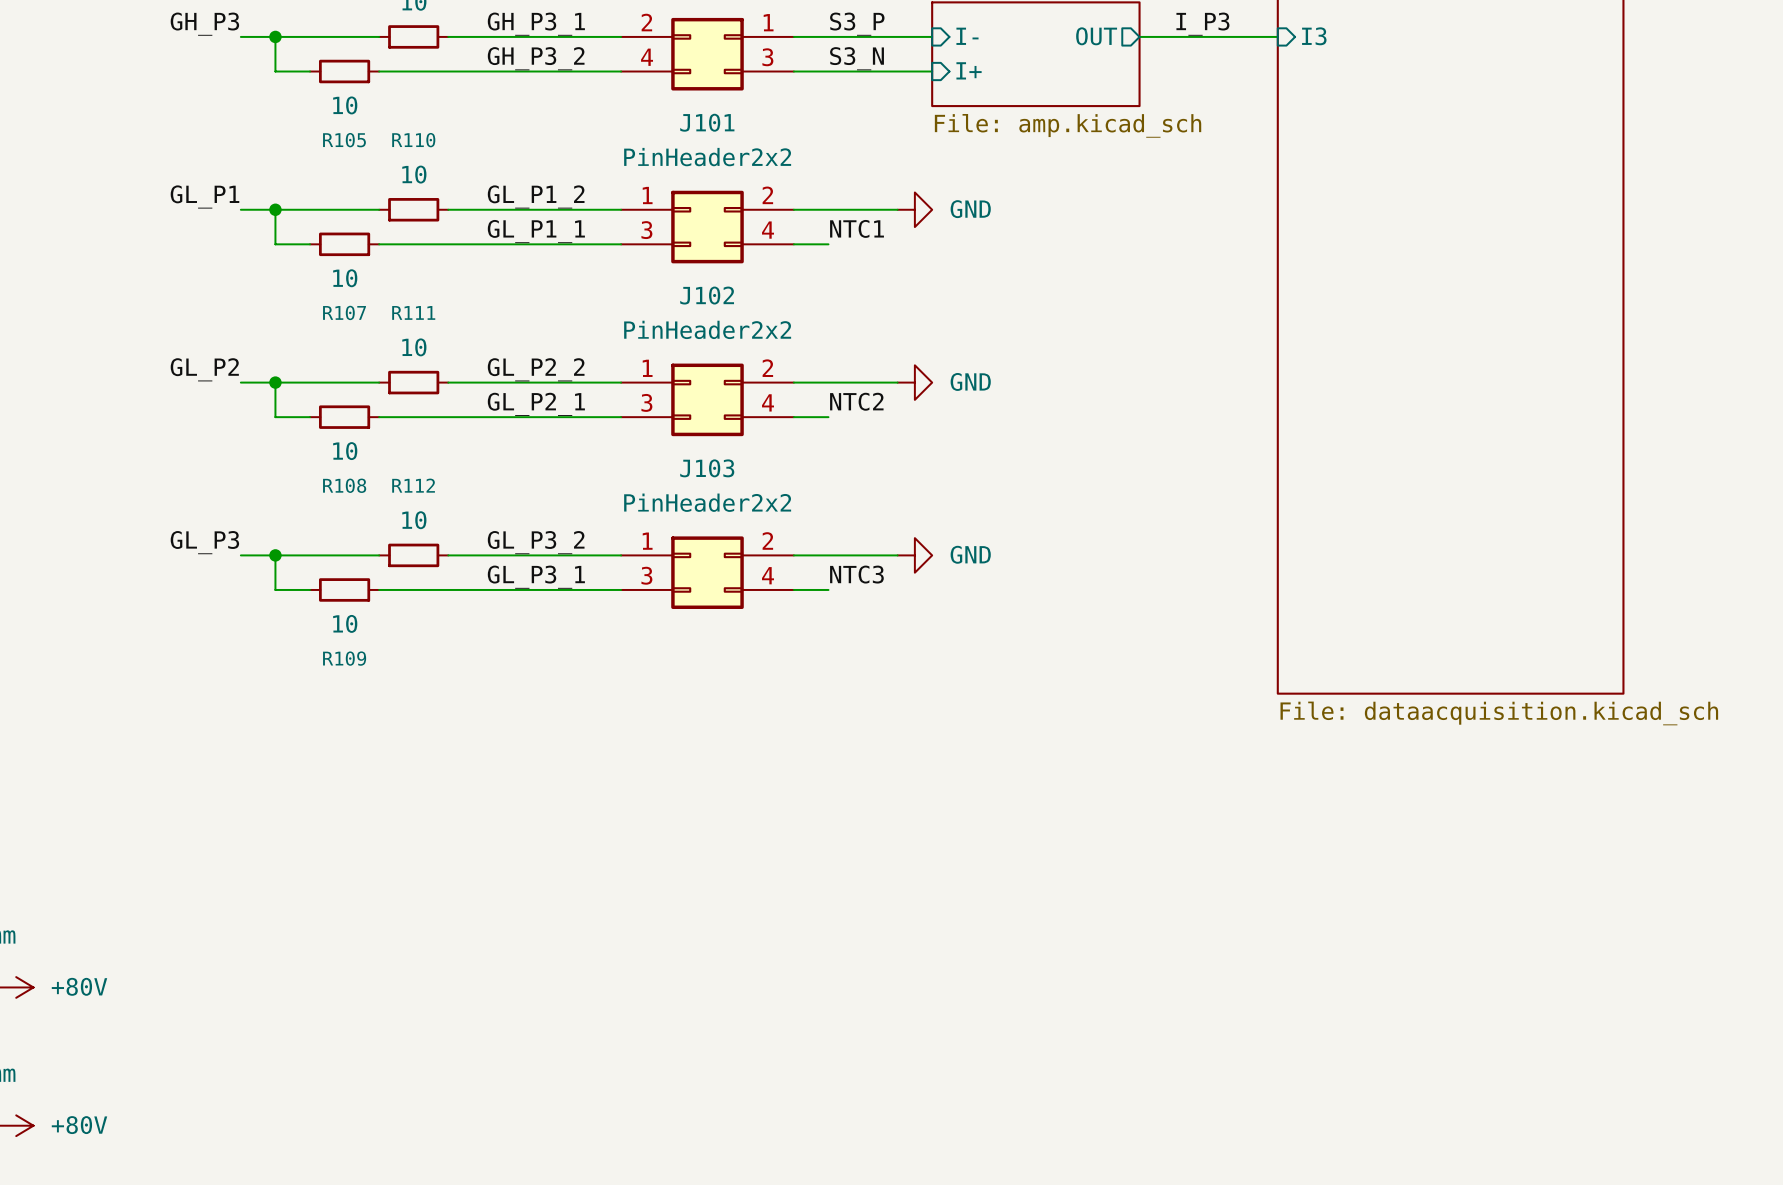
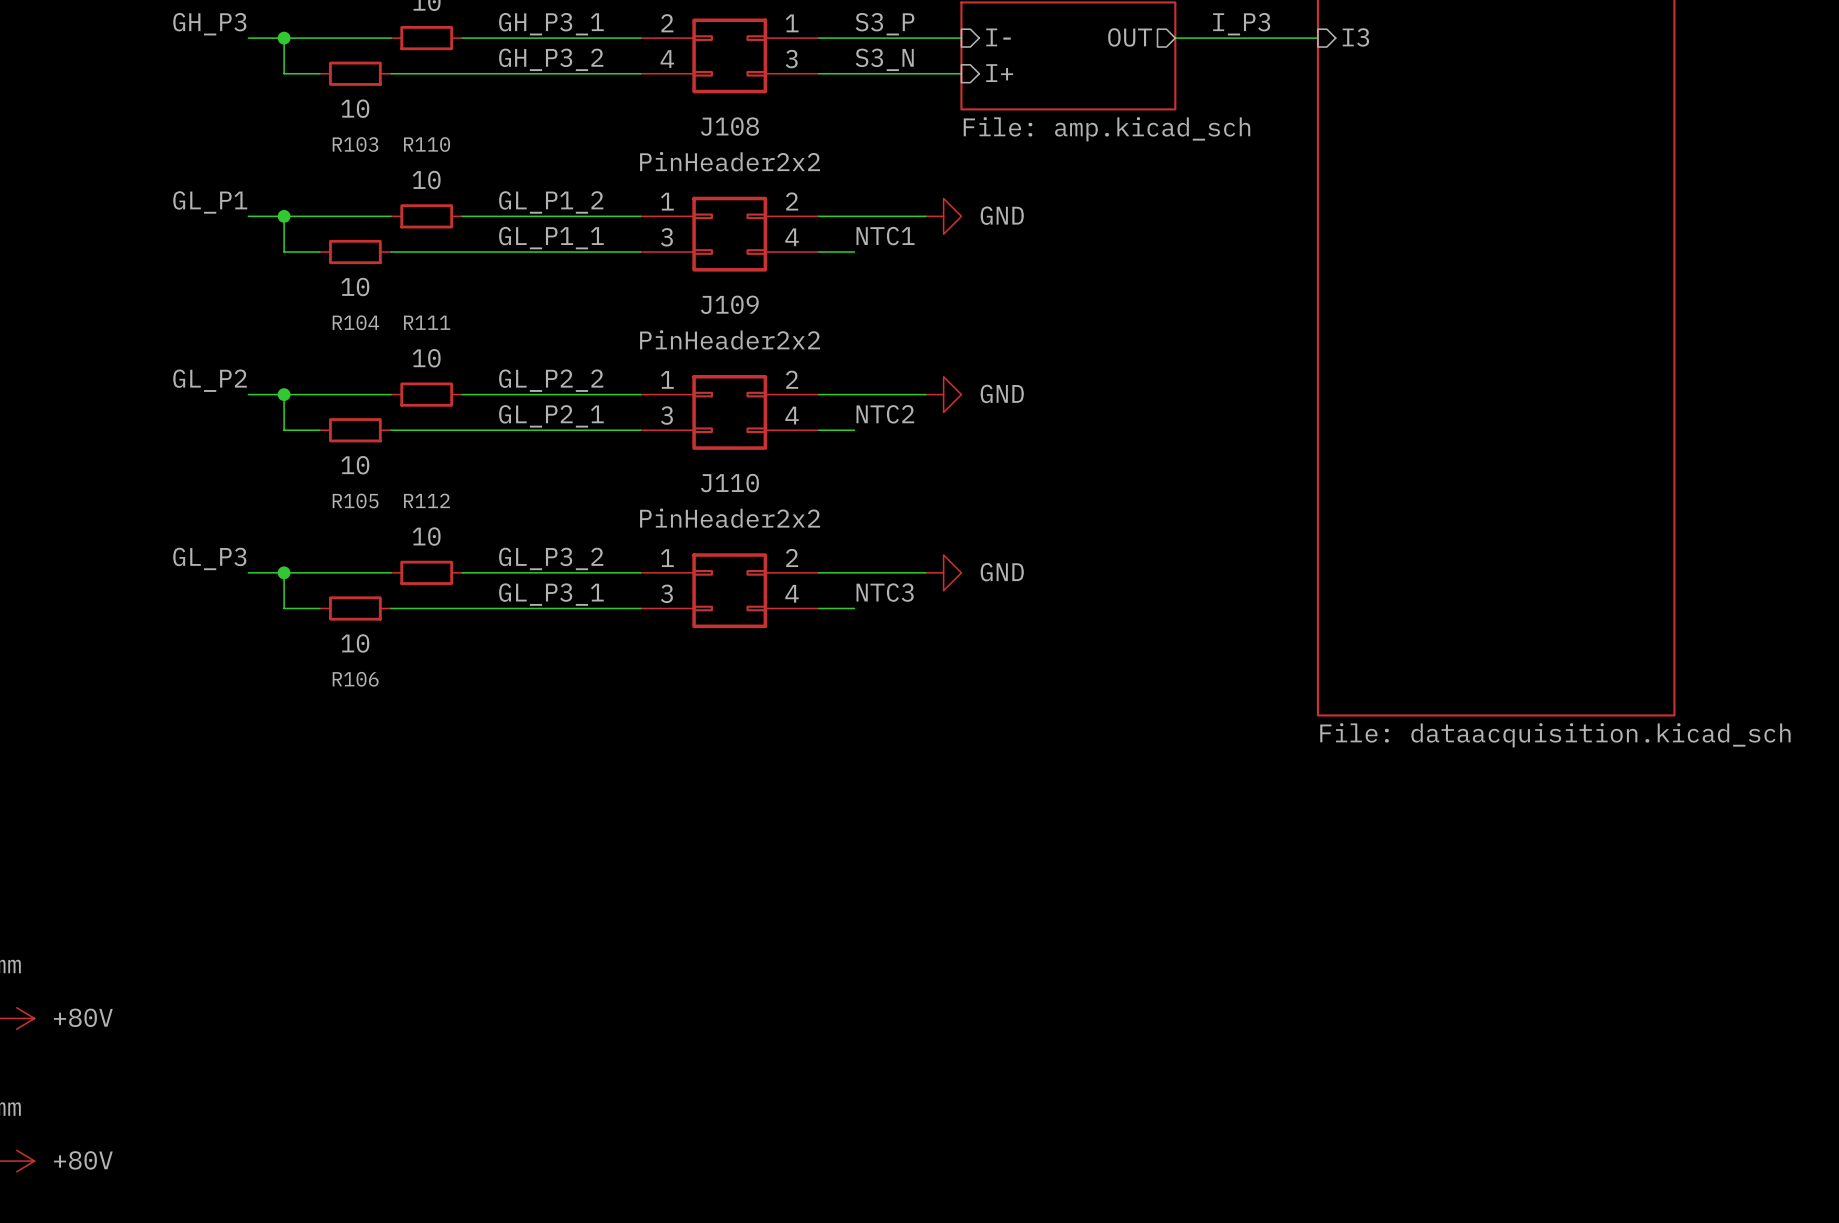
J101 name: J101 (707, 122) -> J108 (729, 126)
R105 name: R105 (344, 140) -> R103 (355, 144)
J102 name: J102 (707, 295) -> J109 (729, 304)
R107 name: R107 (344, 312) -> R104 (355, 322)
J103 name: J103 (707, 468) -> J110 (729, 483)
R108 name: R108 (344, 485) -> R105 (355, 501)
R109 name: R109 (344, 658) -> R106 (355, 679)

